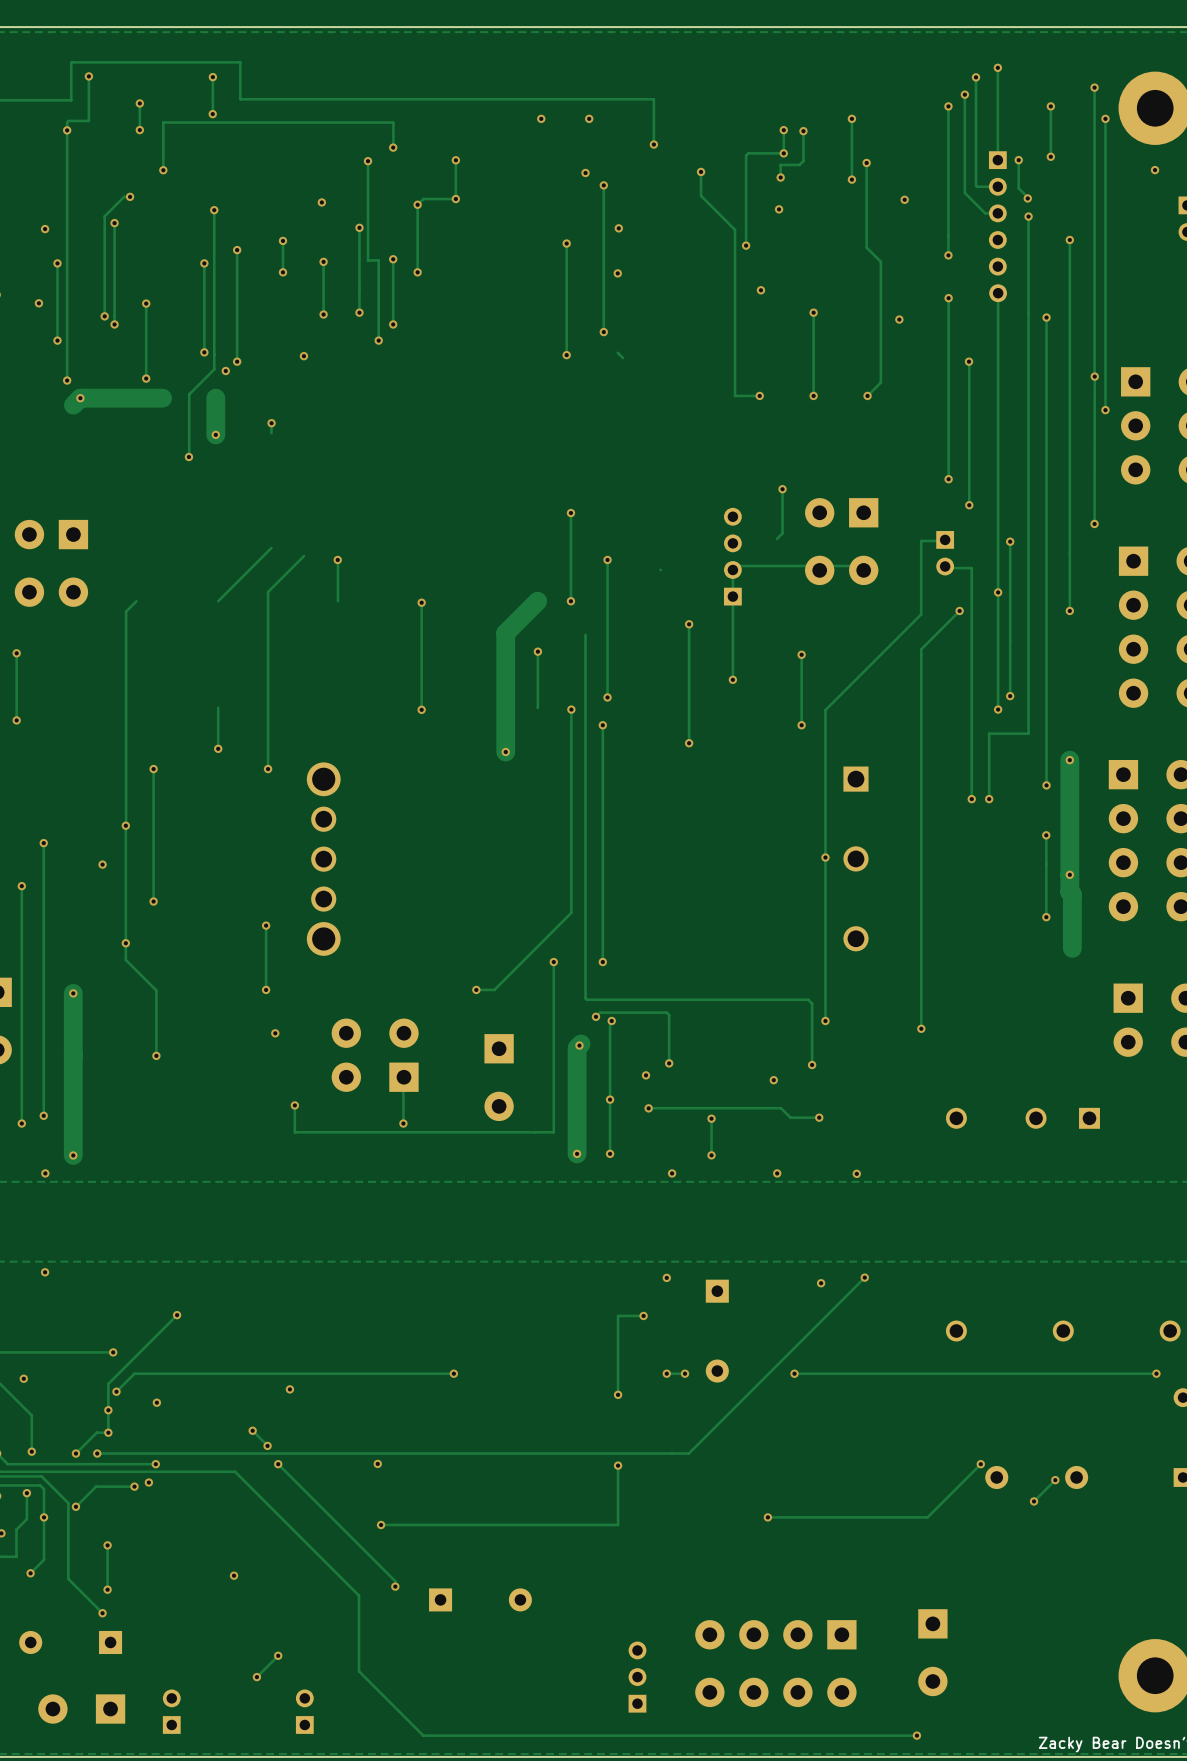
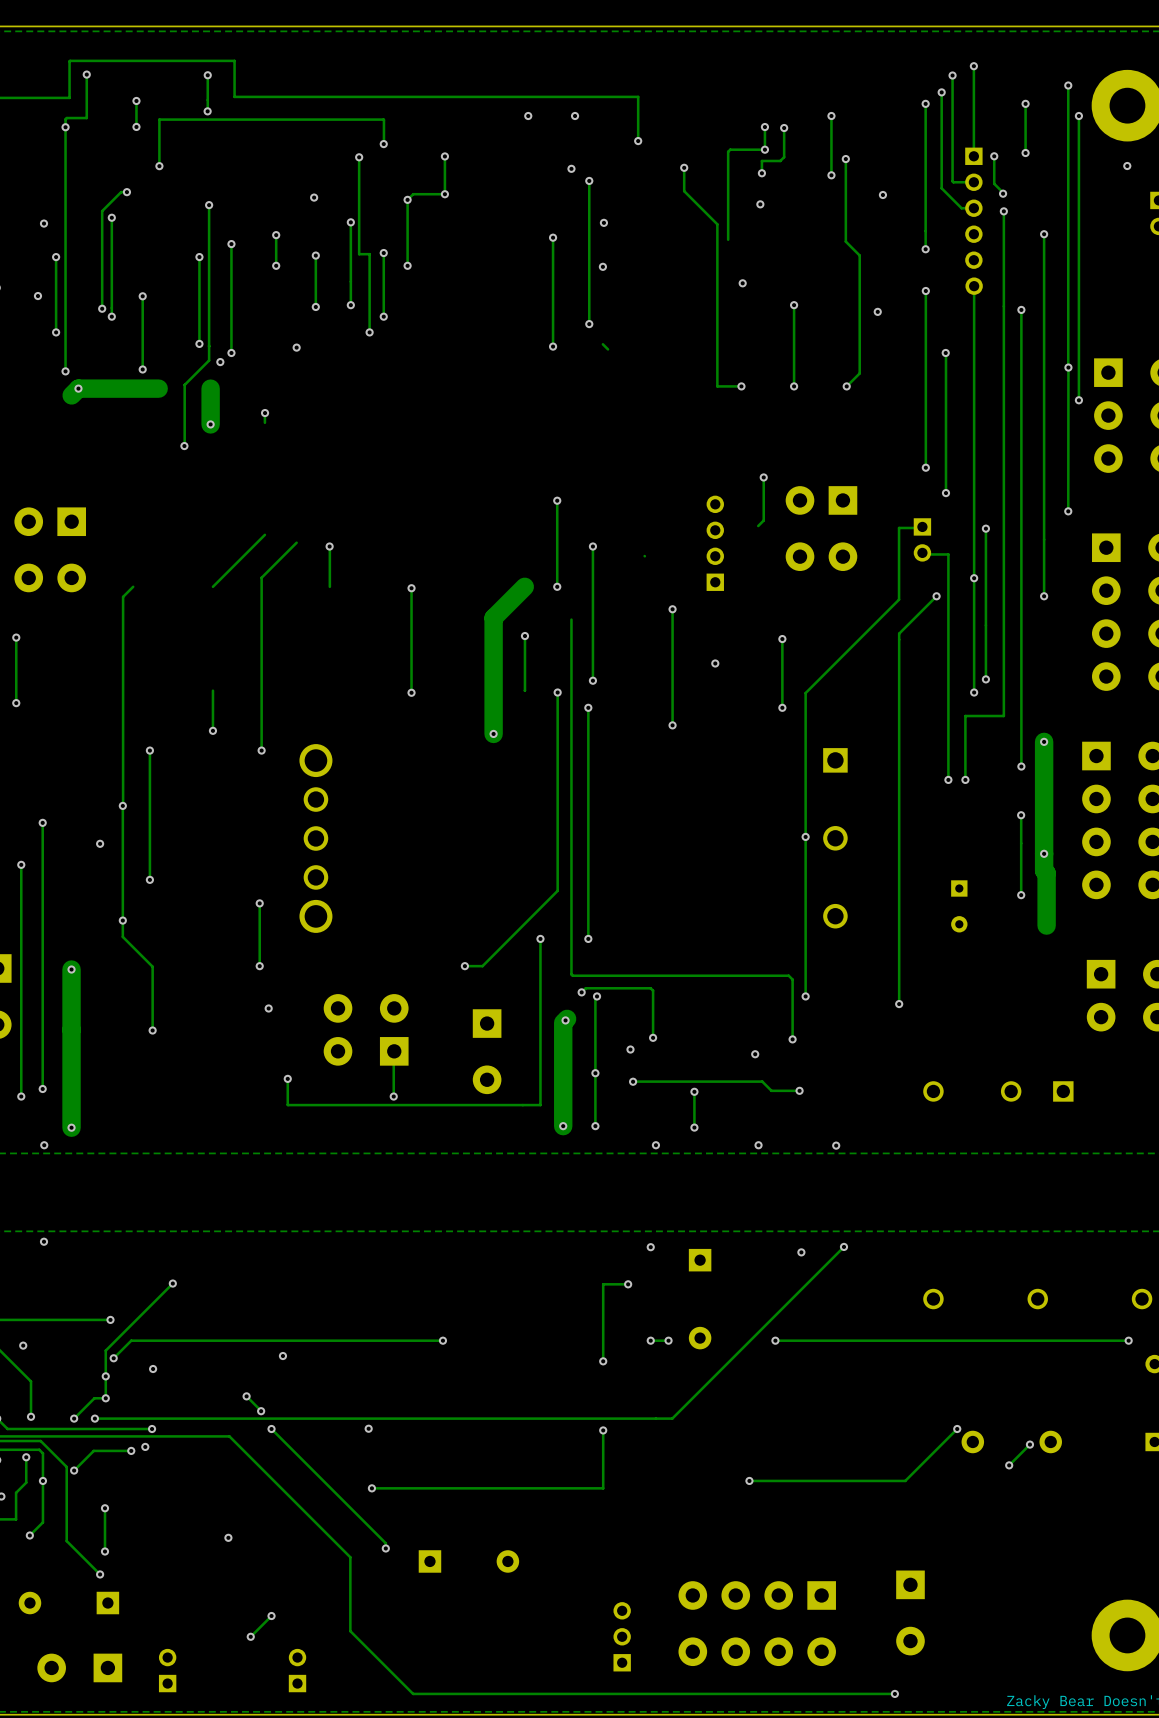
via: (746, 245) -> none
track: (863, 565) (736, 565) (732, 569) -> none
track: (734, 567) (732, 679) -> none
part: none -> (959, 906)

